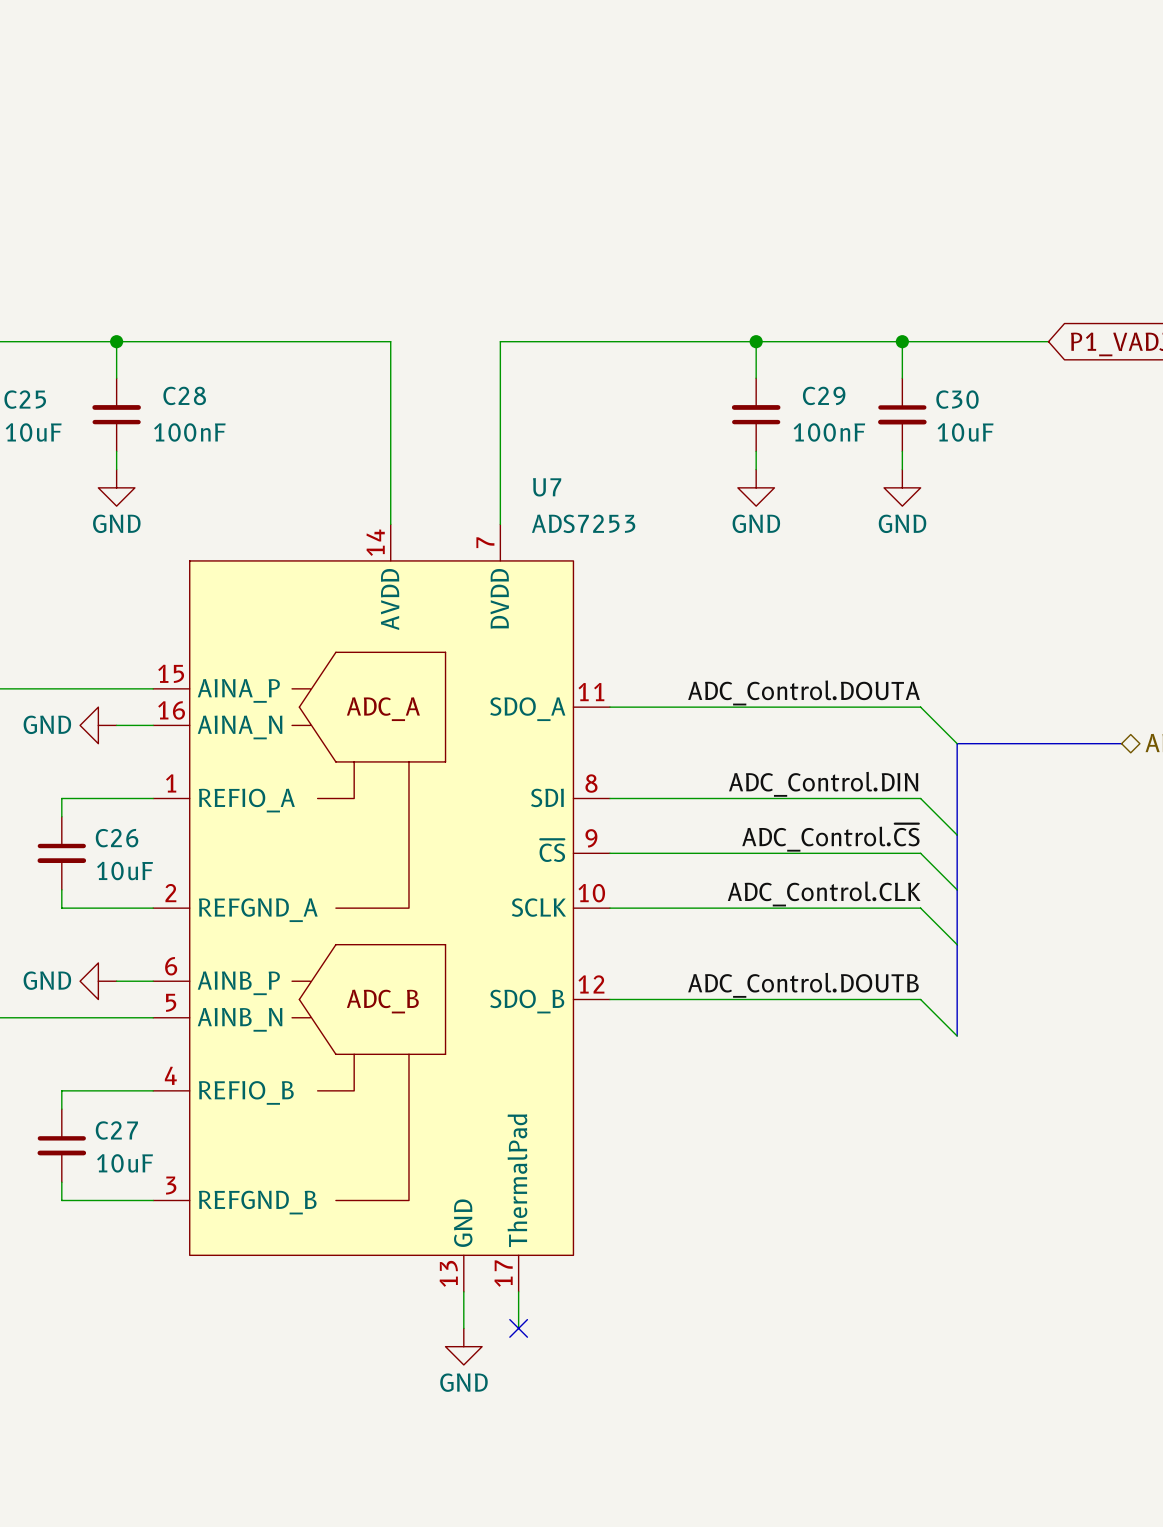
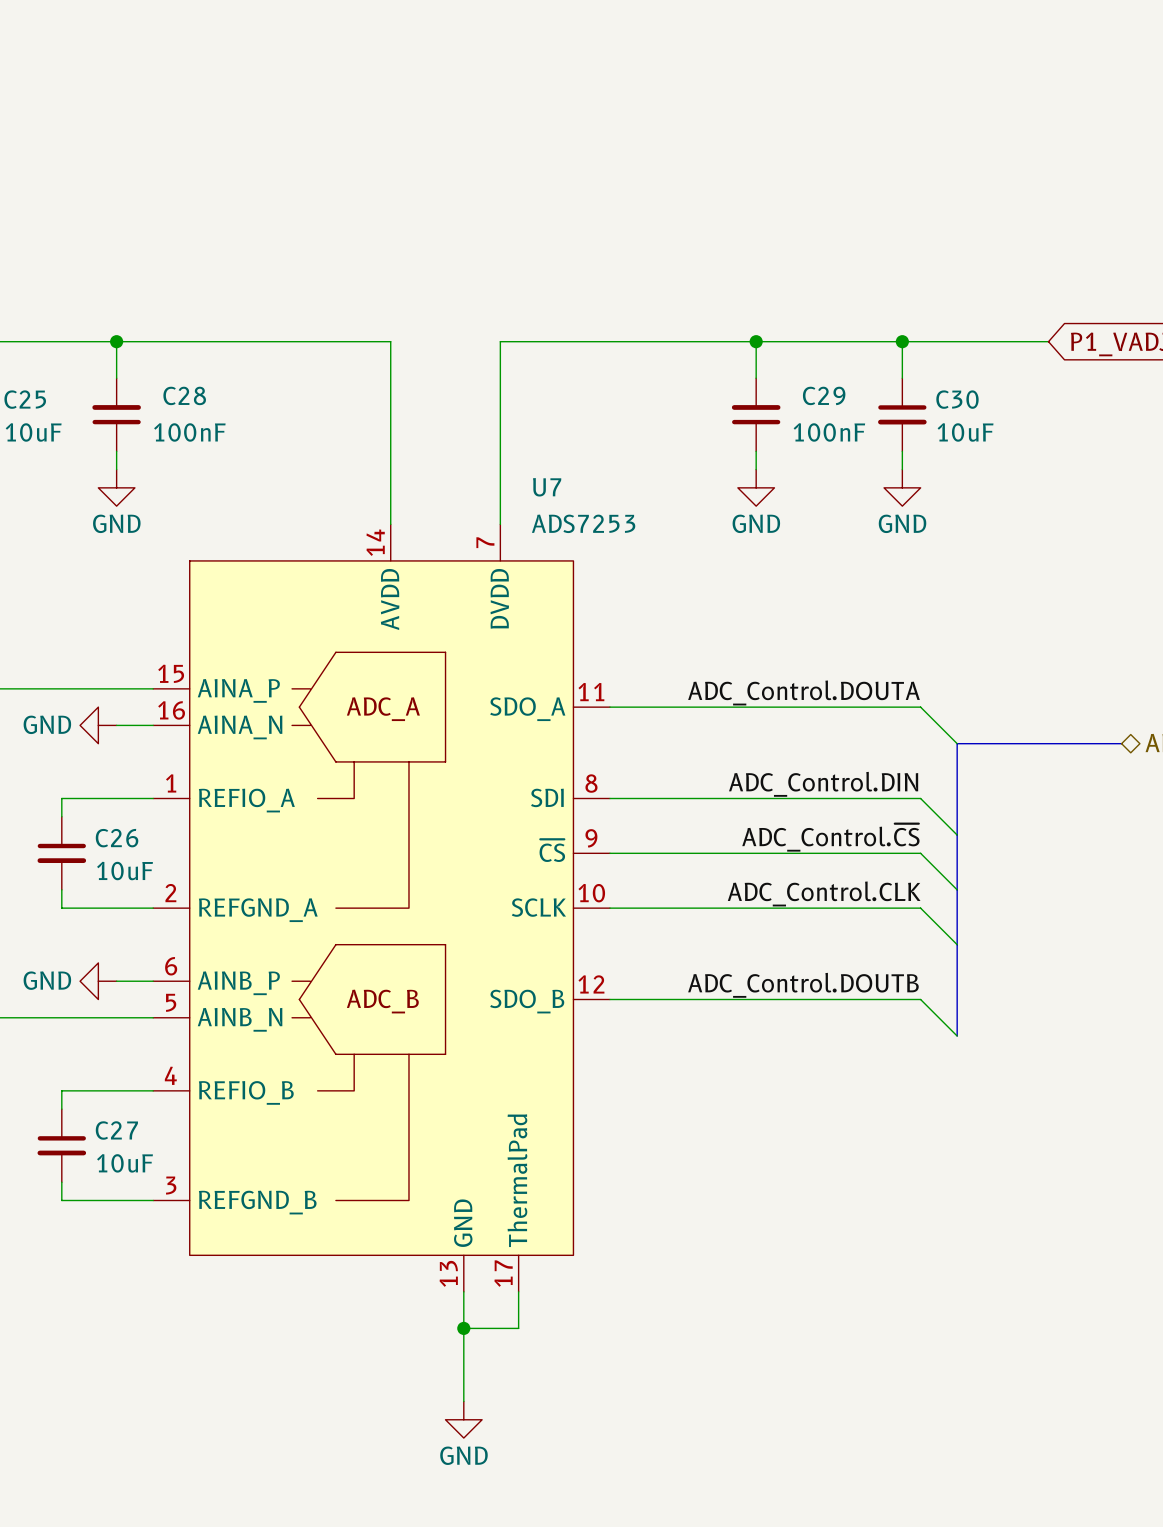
junction: none -> (463, 1328)
wire: none -> (518, 1328) (463, 1328) (463, 1401)
no-connect mark: (518, 1328) -> none
power symbol position: GND (463, 1346) -> GND (463, 1419)

